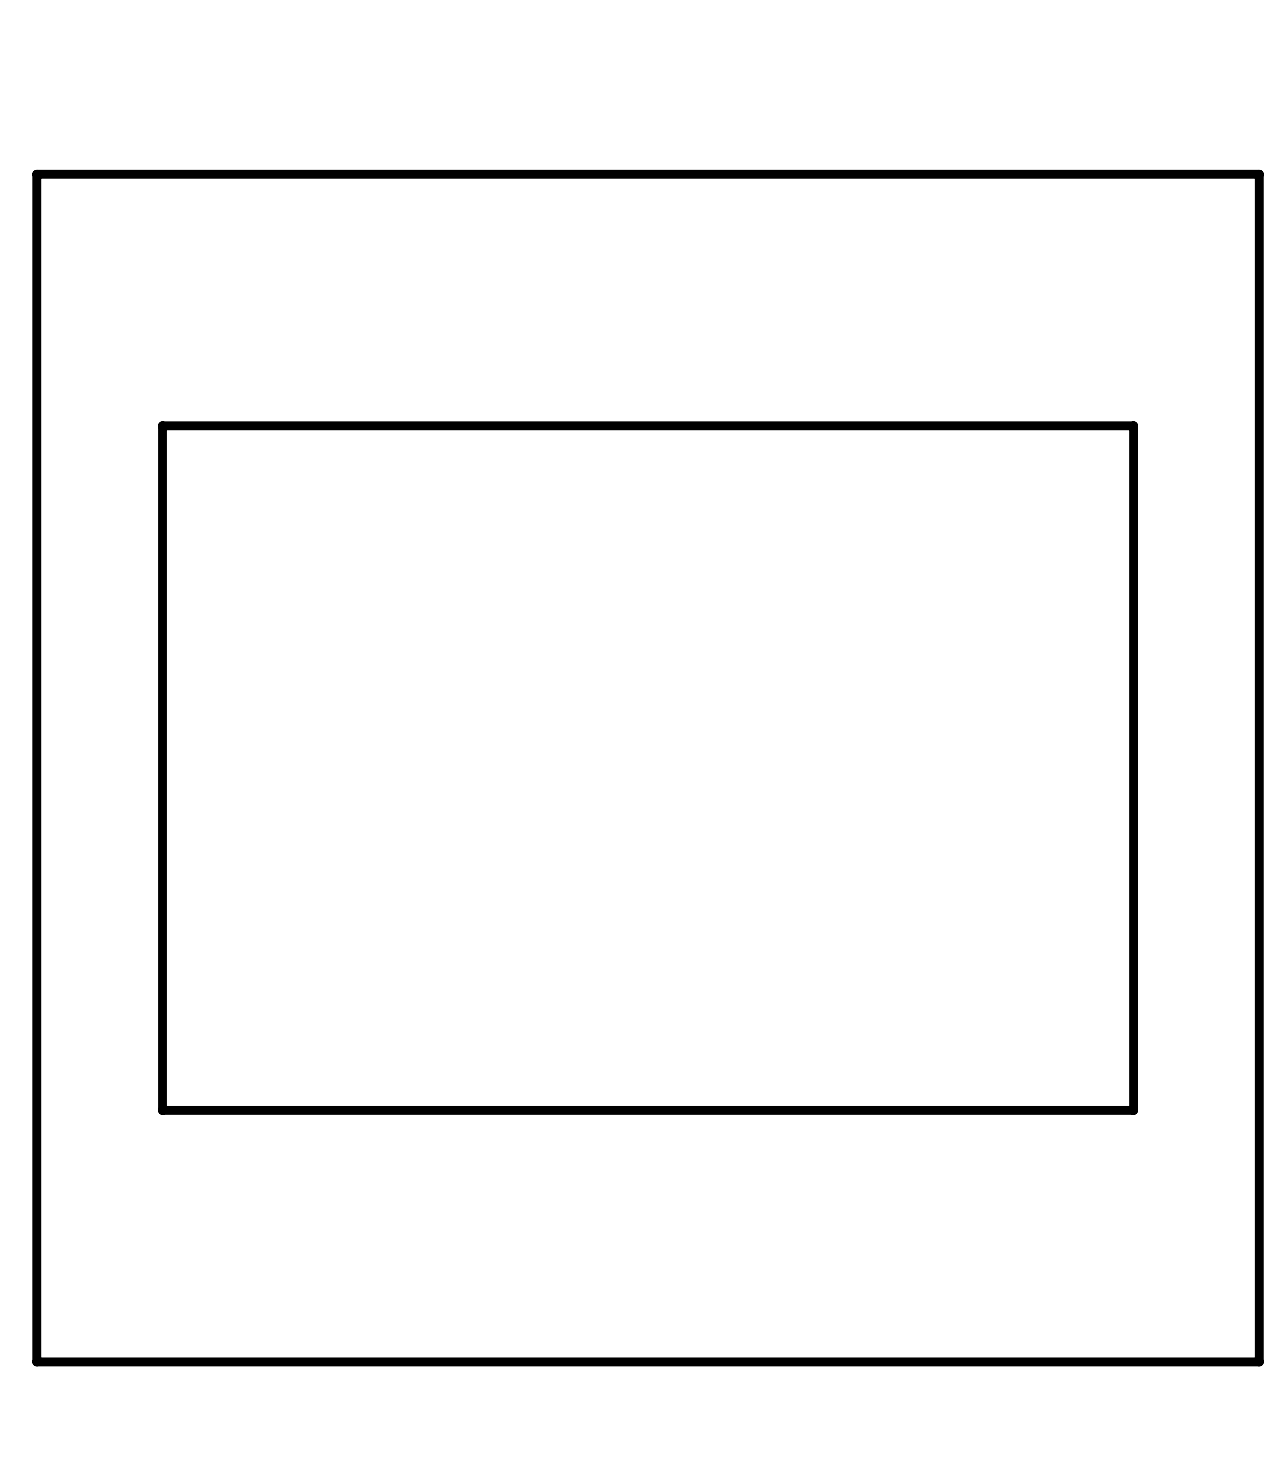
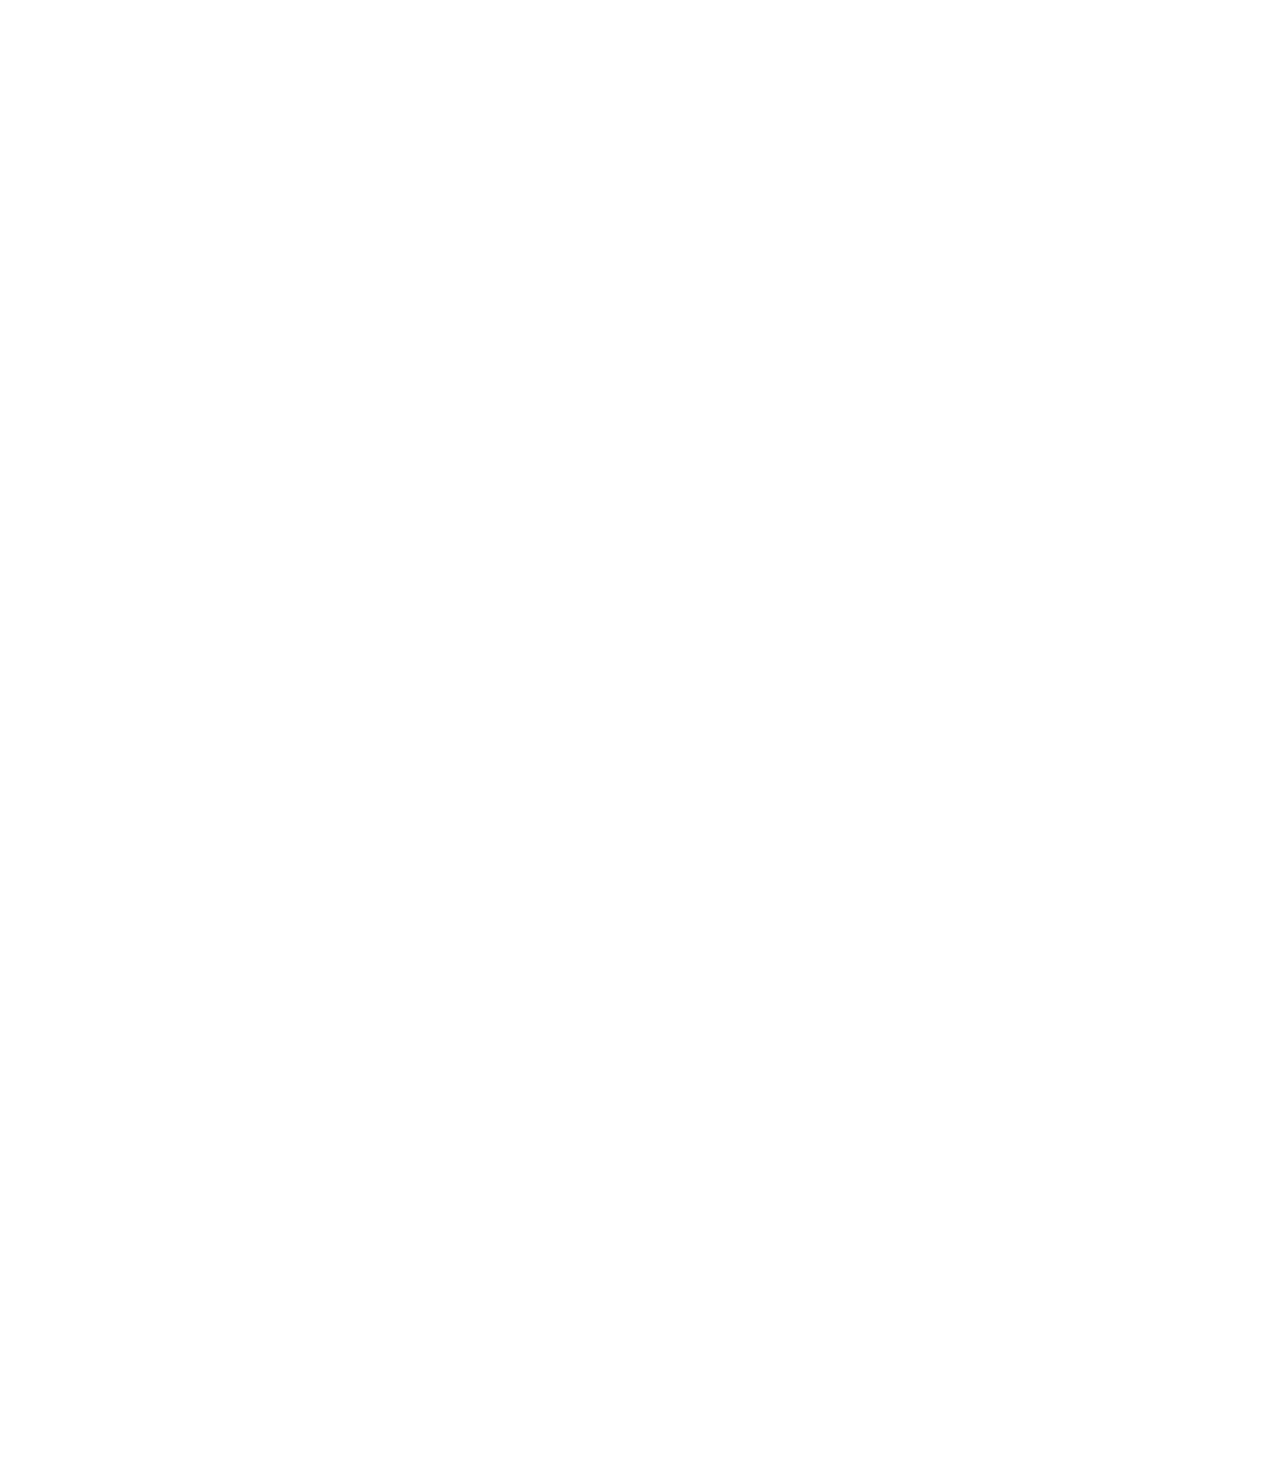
board edge: (36, 174) (1259, 174) (1259, 1361) (36, 1361) (36, 174) -> none
board edge: (162, 425) (162, 1110) (1133, 1110) (1133, 425) (162, 425) -> none

